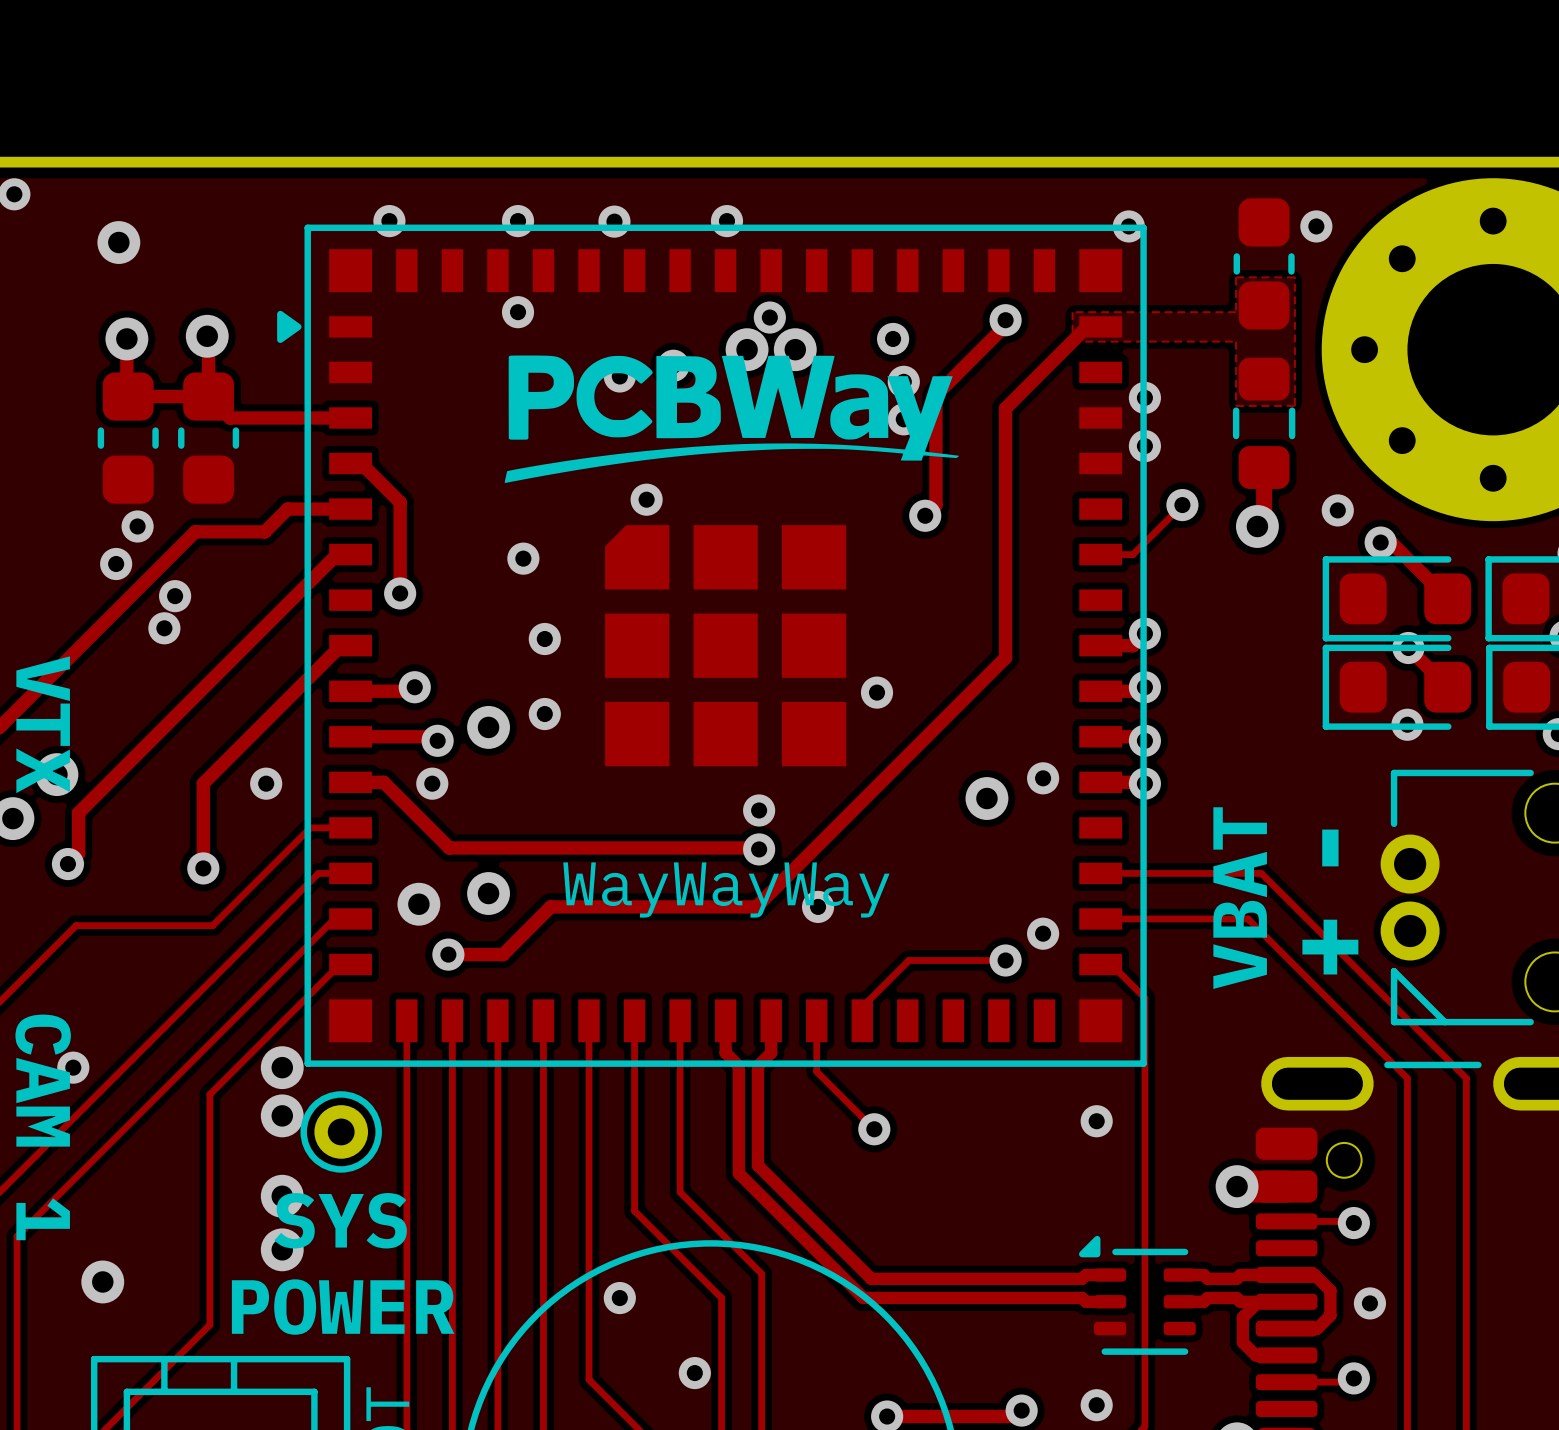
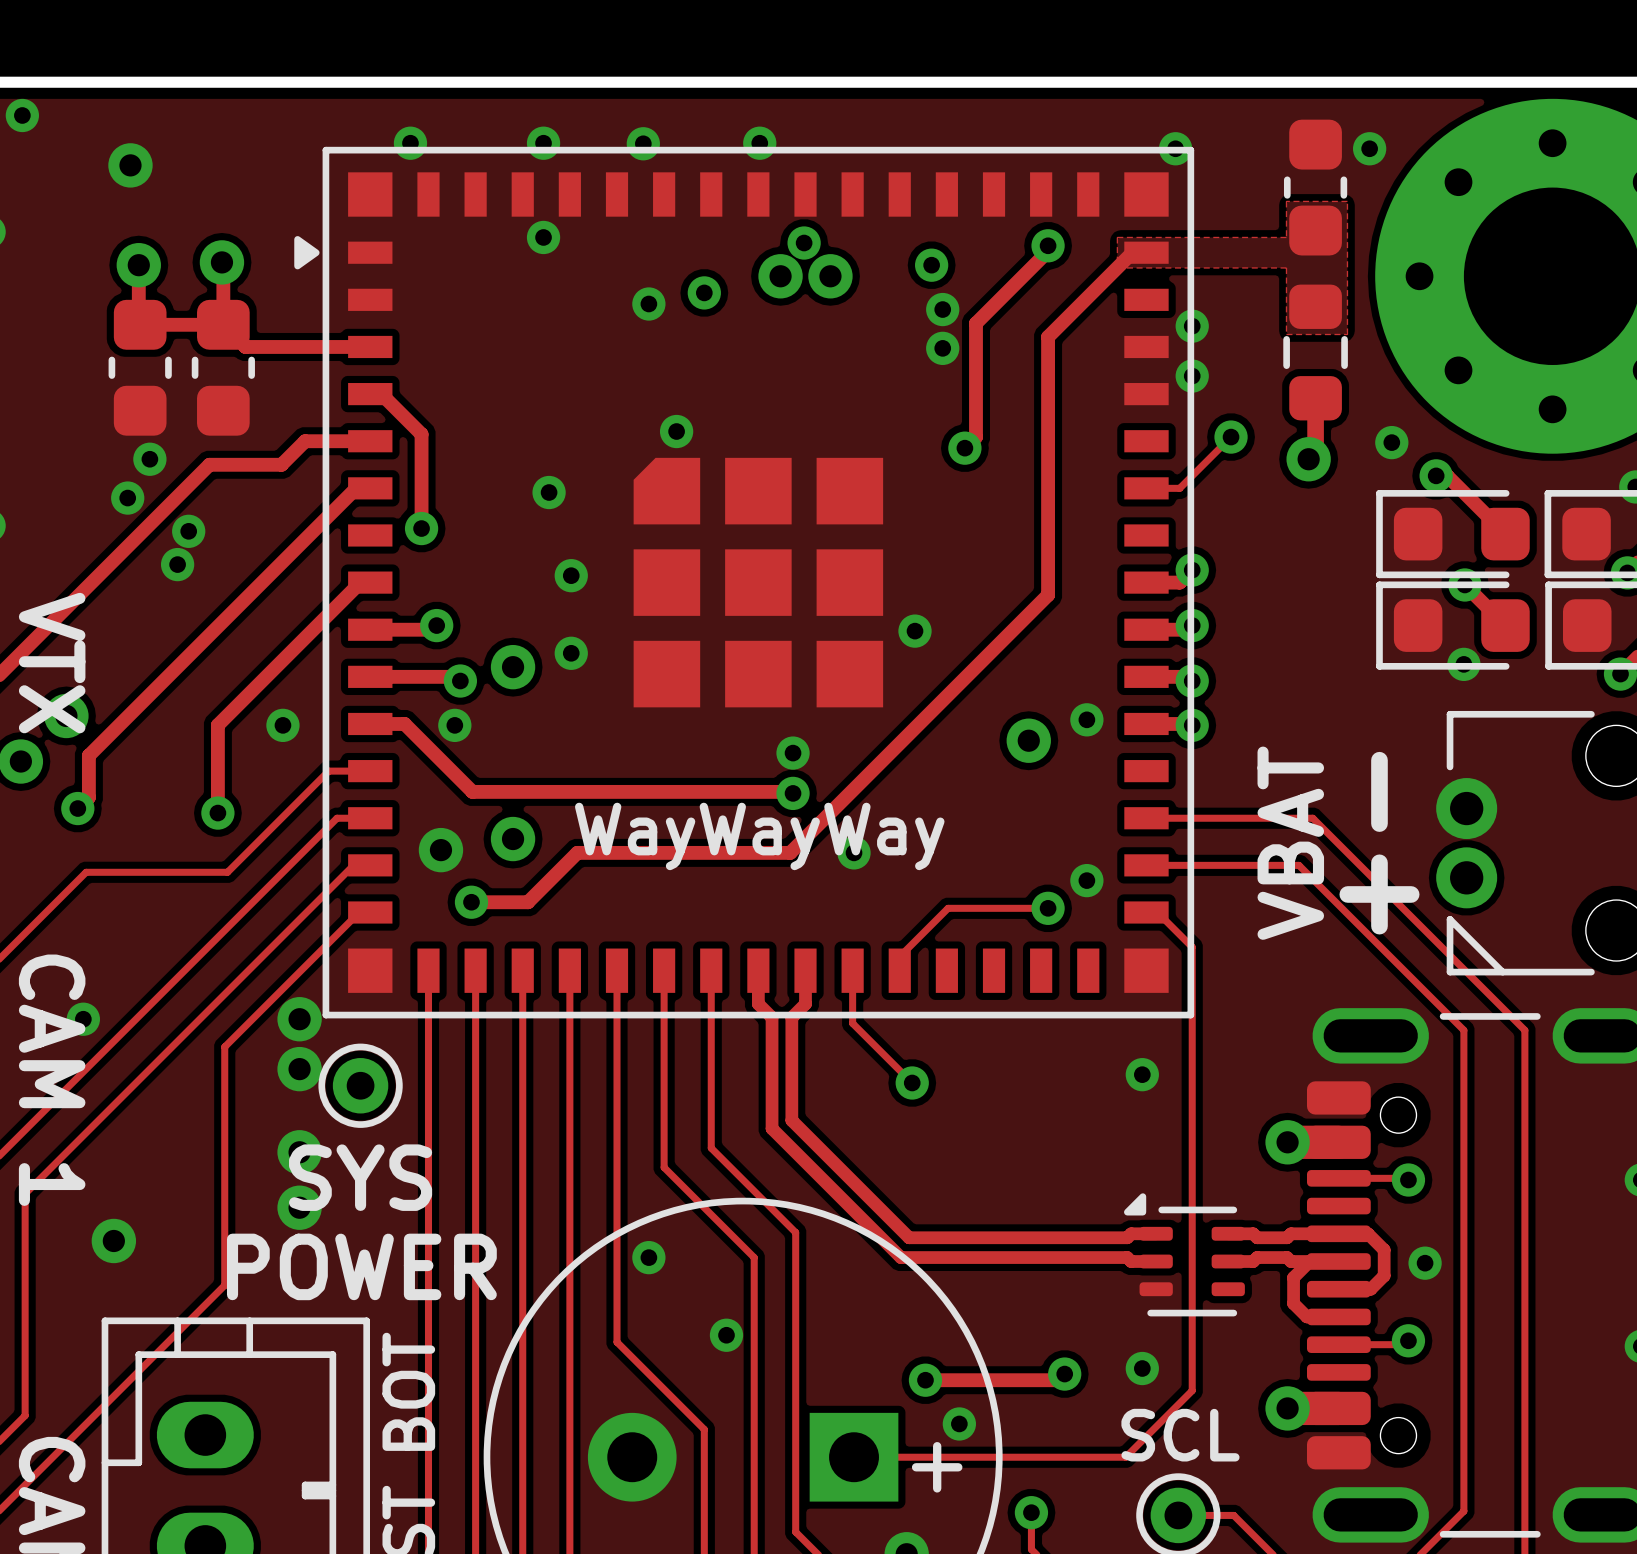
drawing: [504, 355, 959, 483] -> none

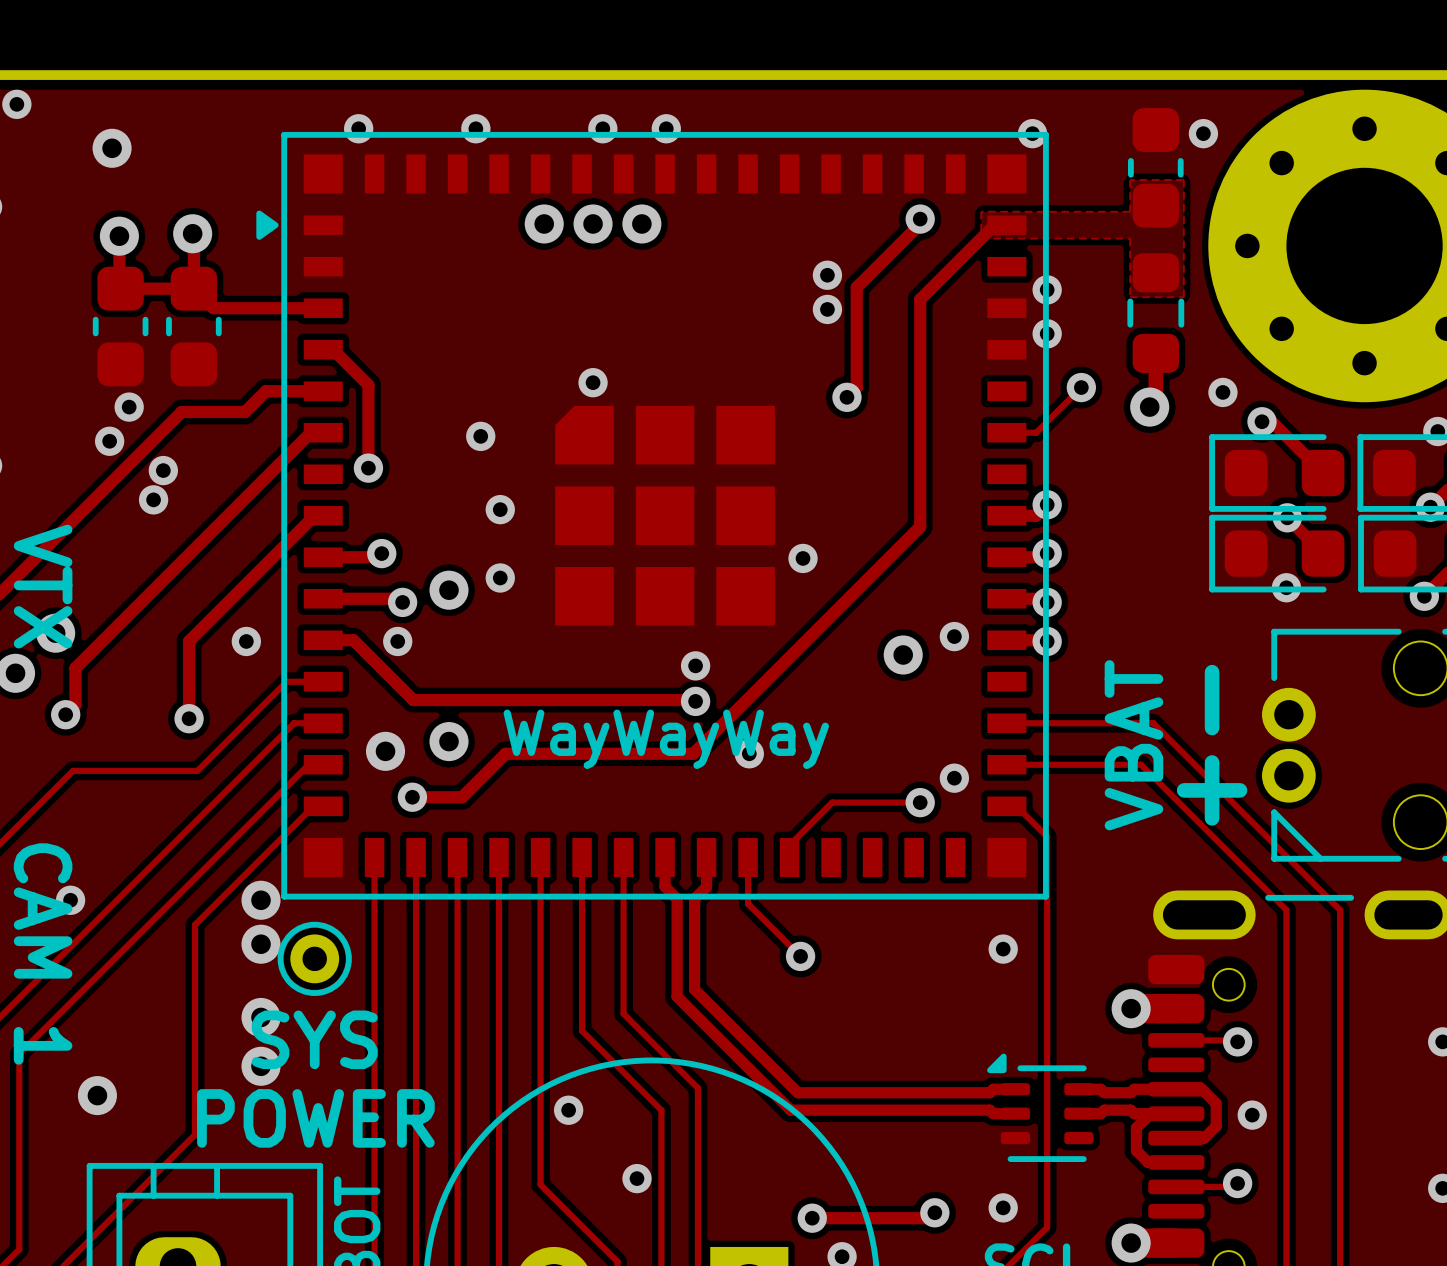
via position: (643, 143) -> (602, 128)
via: (543, 237) -> none
via: (804, 243) -> none
via: none -> (544, 223)
via: none -> (593, 223)
via: none -> (641, 223)
via: (931, 265) -> none
via: (780, 276) -> none
via: (830, 276) -> none
via: (704, 292) -> none
via: (648, 304) -> none

